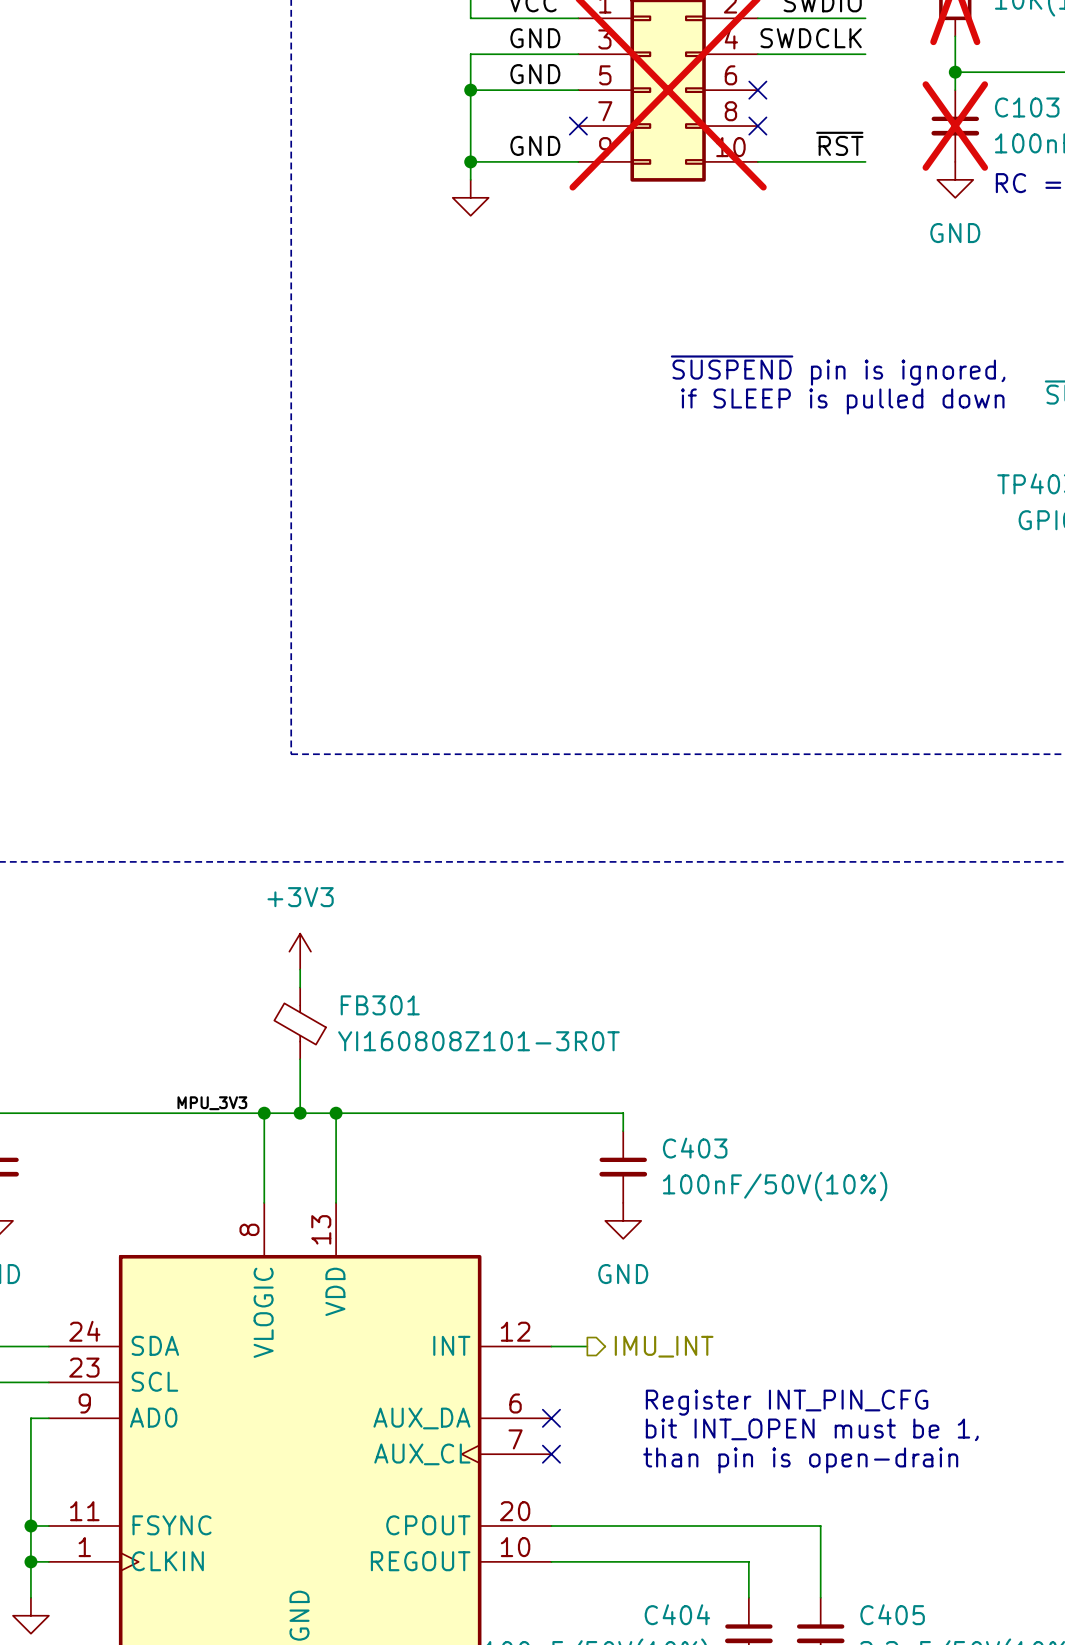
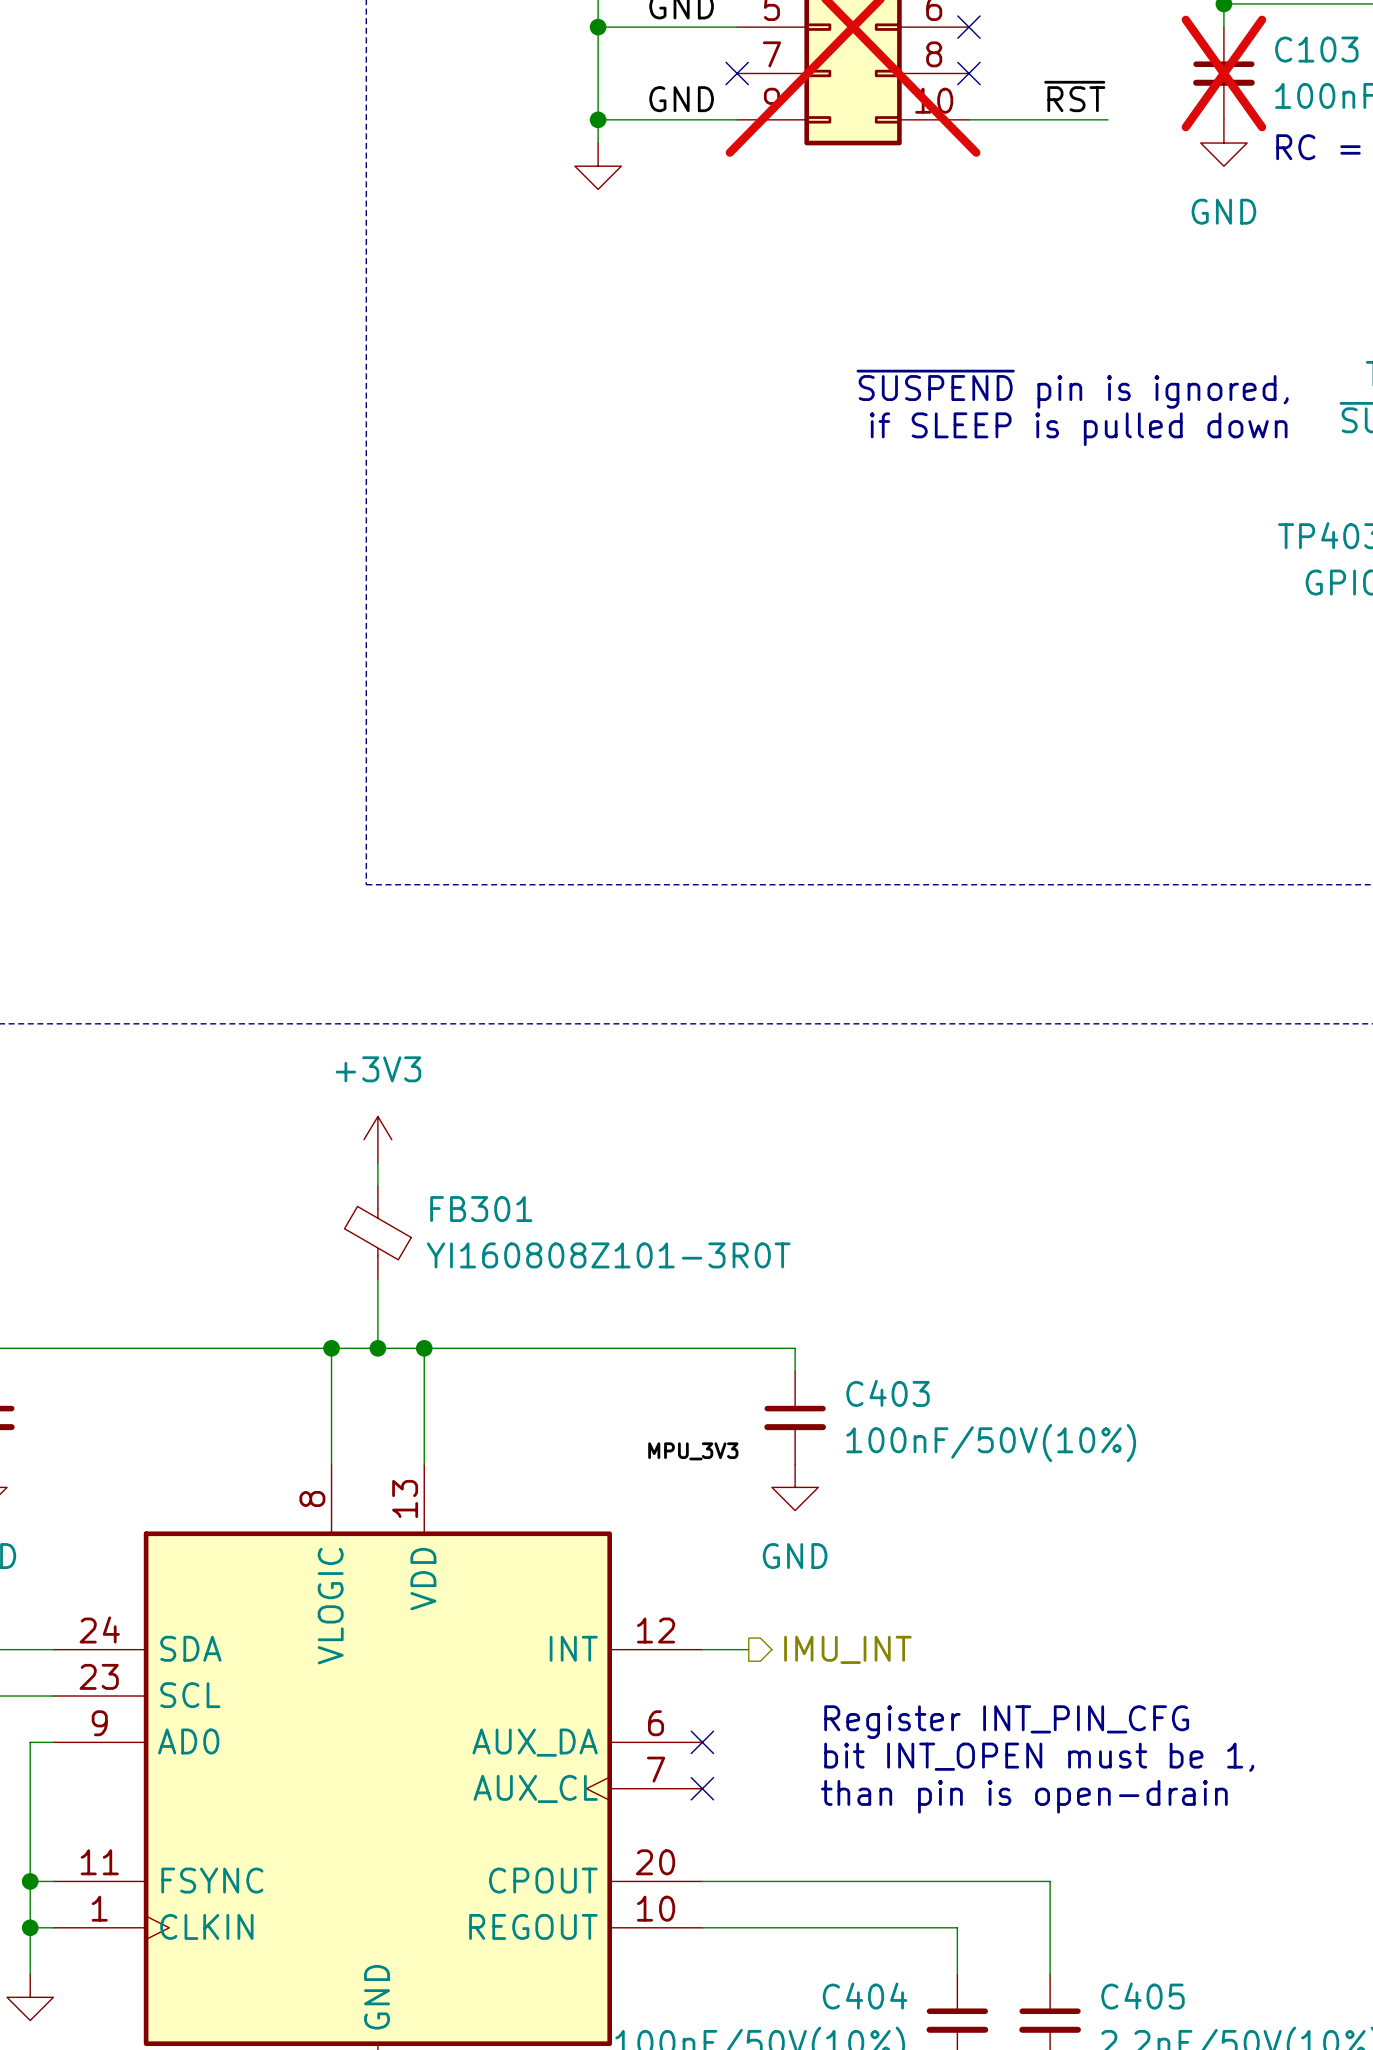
label position: MPU_3V3 (212, 1103) -> MPU_3V3 (693, 1451)

